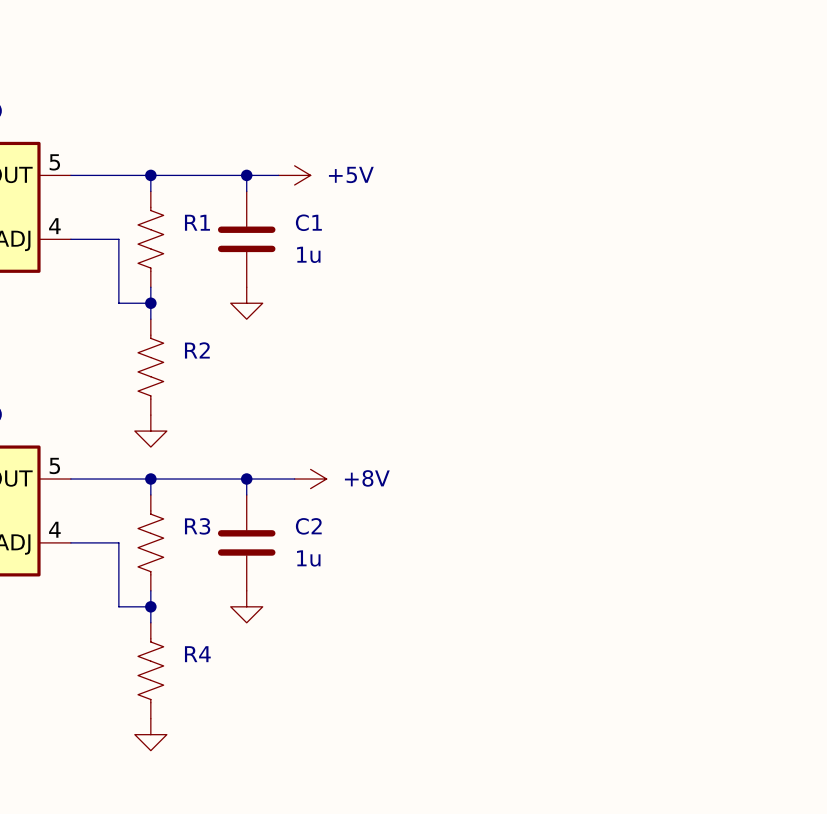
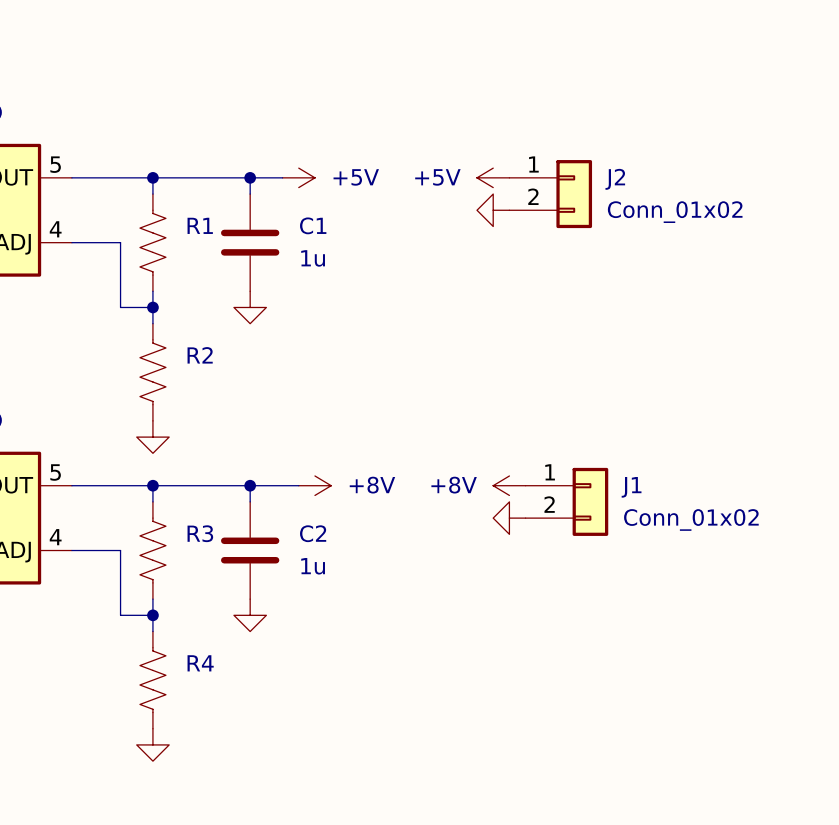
power symbol: none -> +5V (493, 177)
J2: none -> Conn_01x02 (550, 194)
power symbol: none -> (493, 210)
power symbol: none -> +8V (509, 485)
J1: none -> Conn_01x02 (566, 501)
power symbol: none -> (509, 518)

